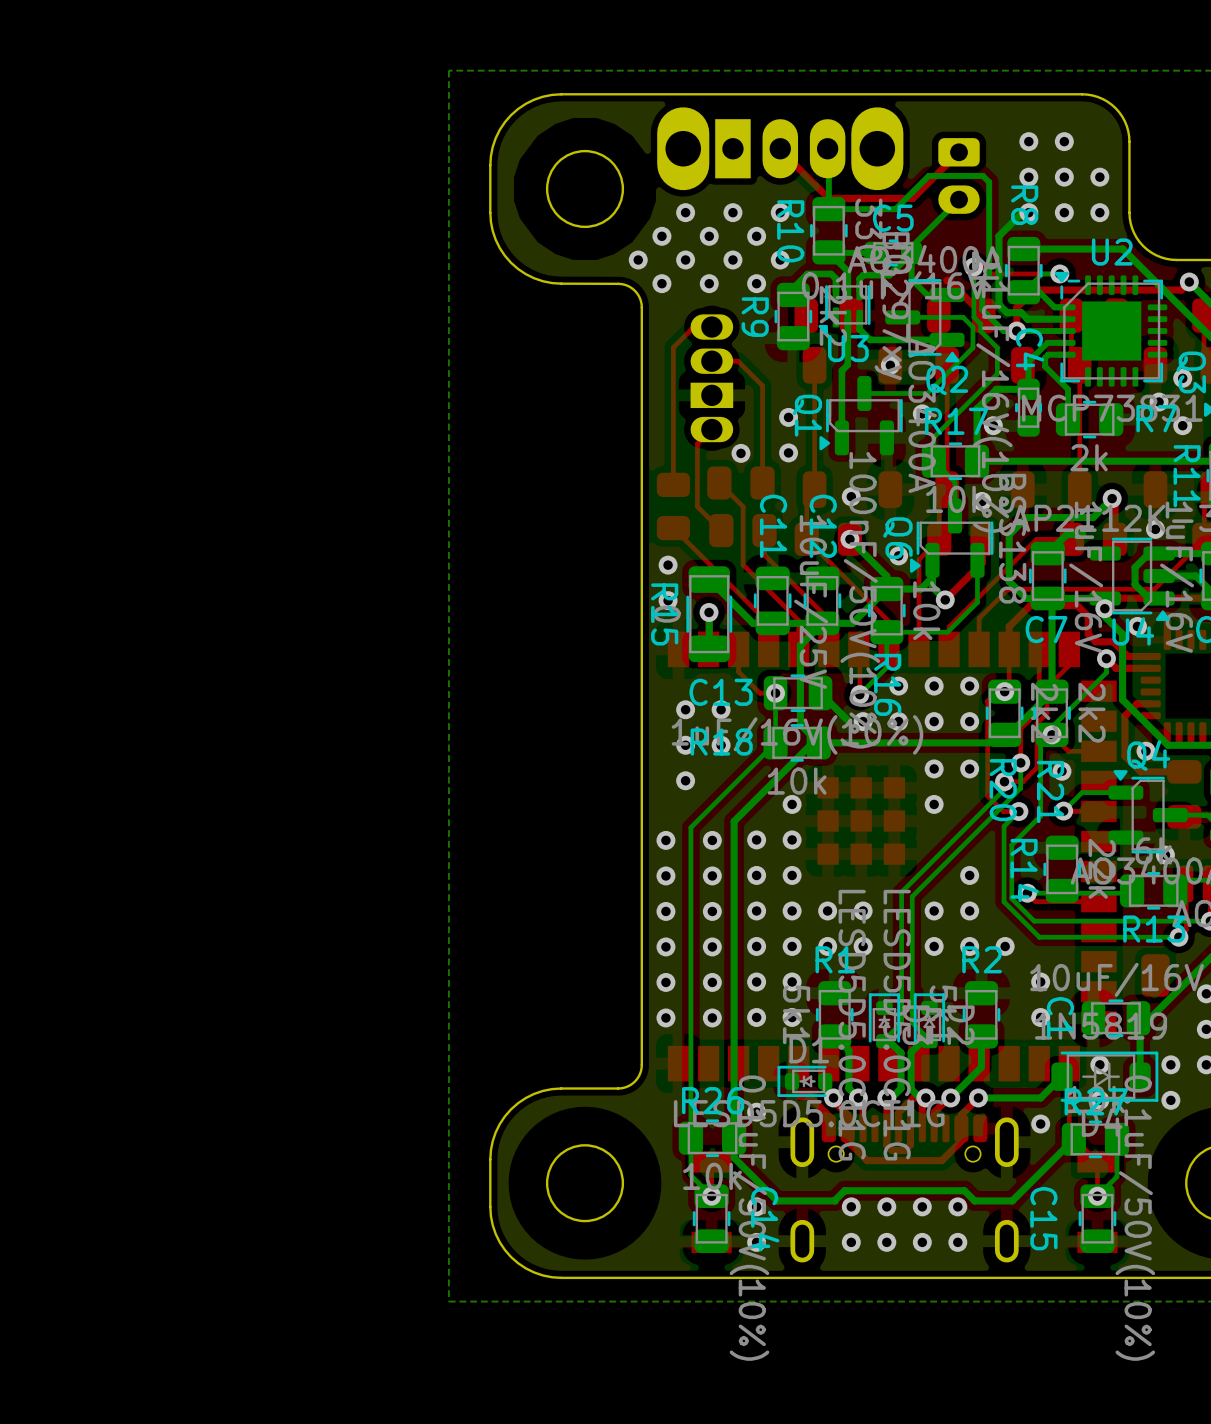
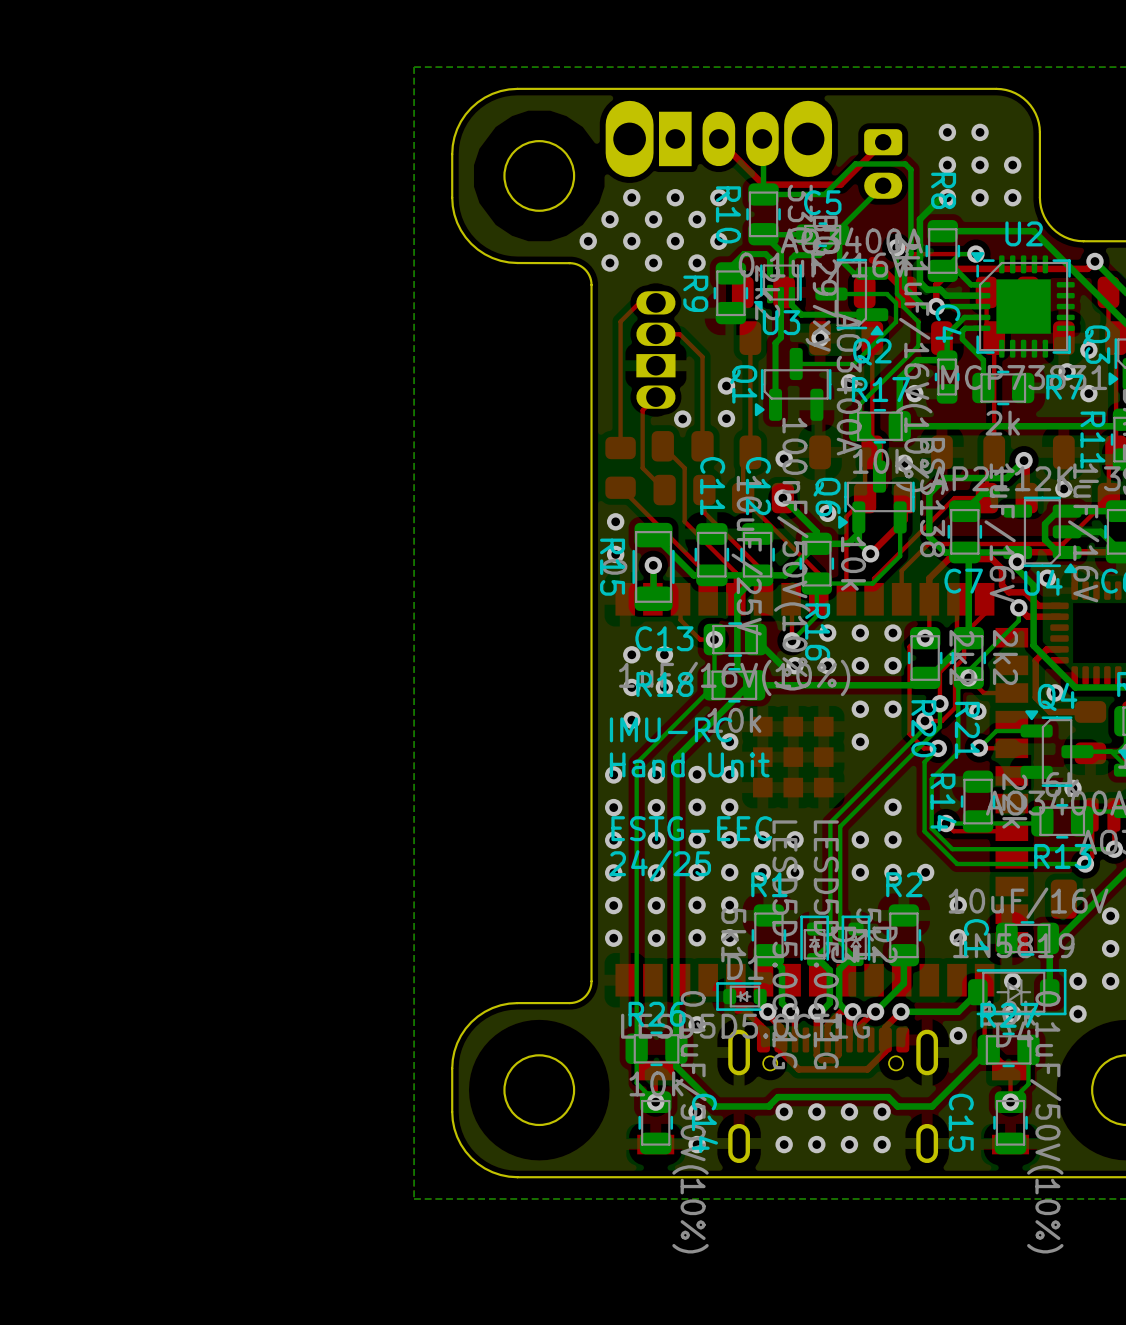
text: none -> IMU-RC (671, 729)
text: none -> Hand Unit (689, 764)
text: none -> ESTG-EEC (691, 828)
text: none -> 24/25 (660, 865)

